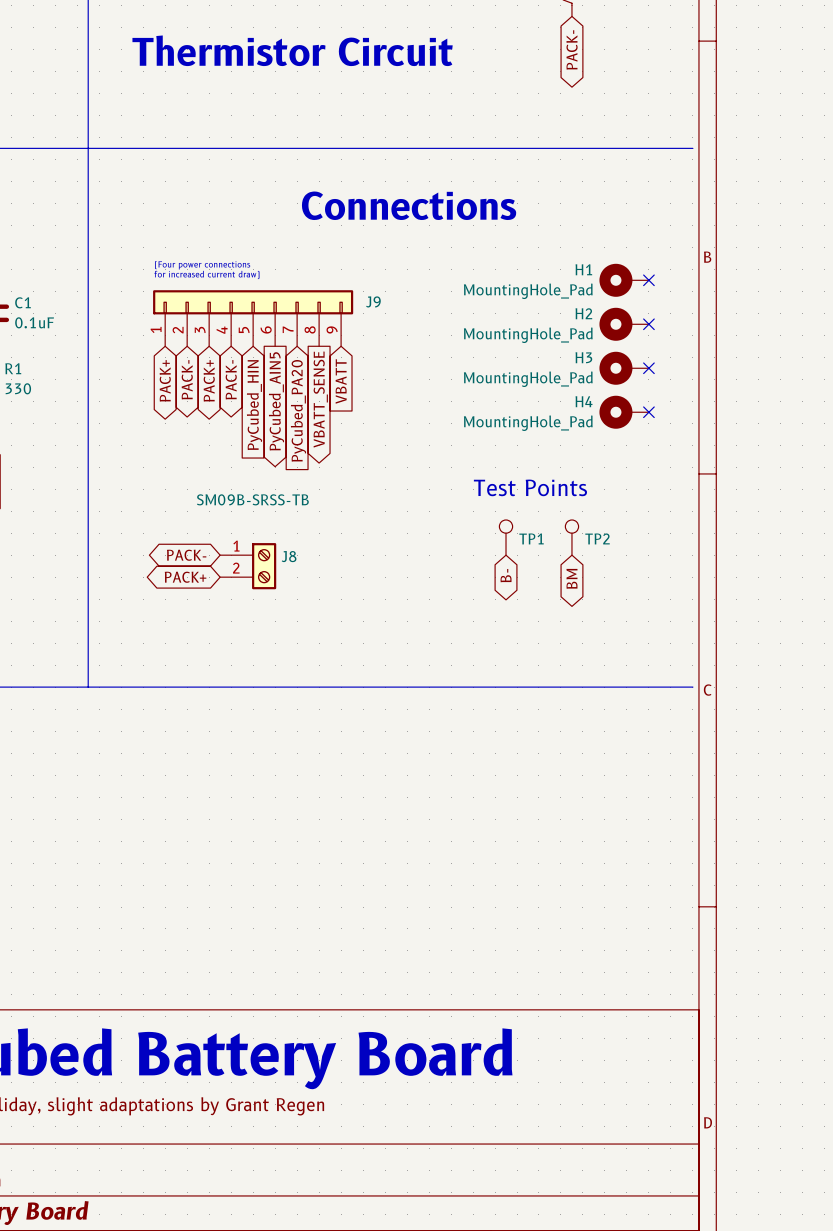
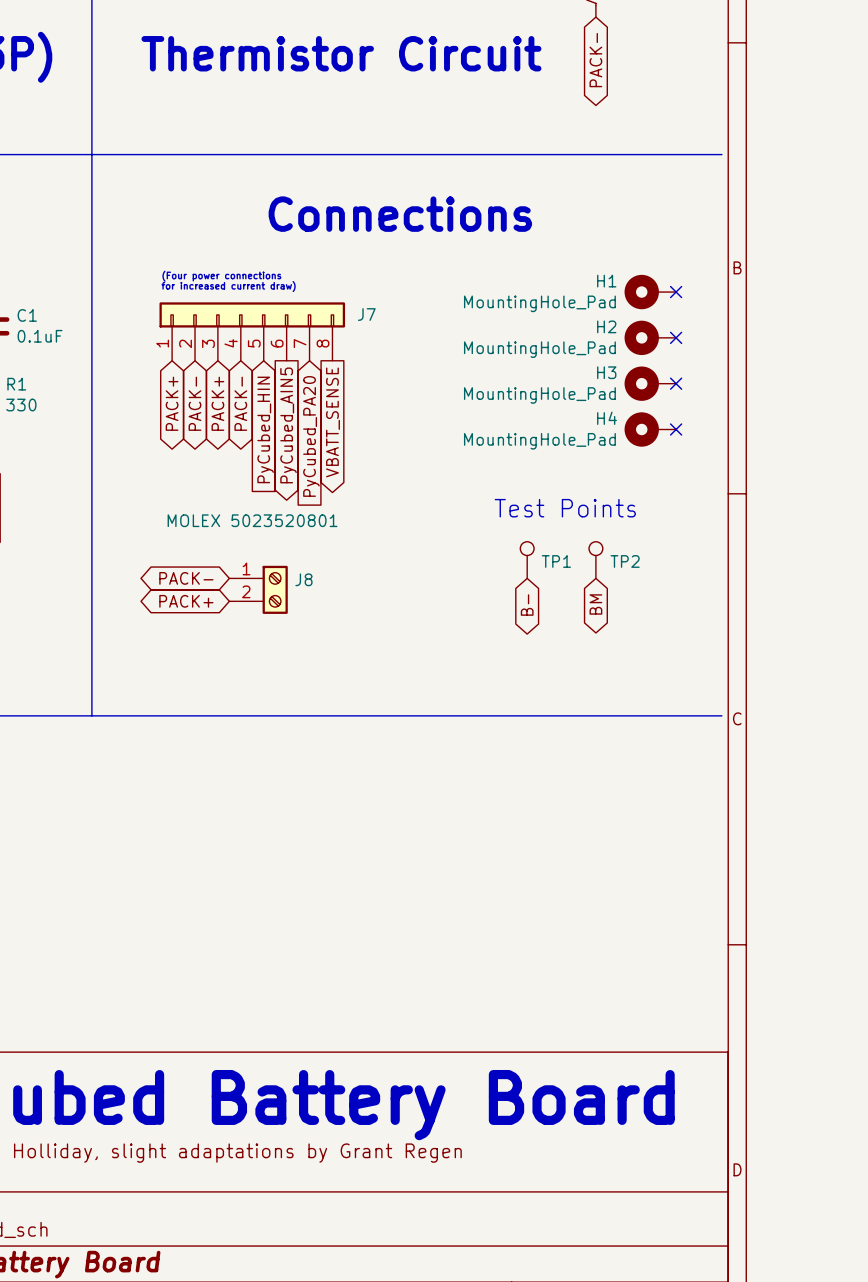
J7: none -> MOLEX 5023520801 (252, 331)
J9: SM09B-SRSS-TB (253, 318) -> none
global label: VBATT (341, 381) -> none

